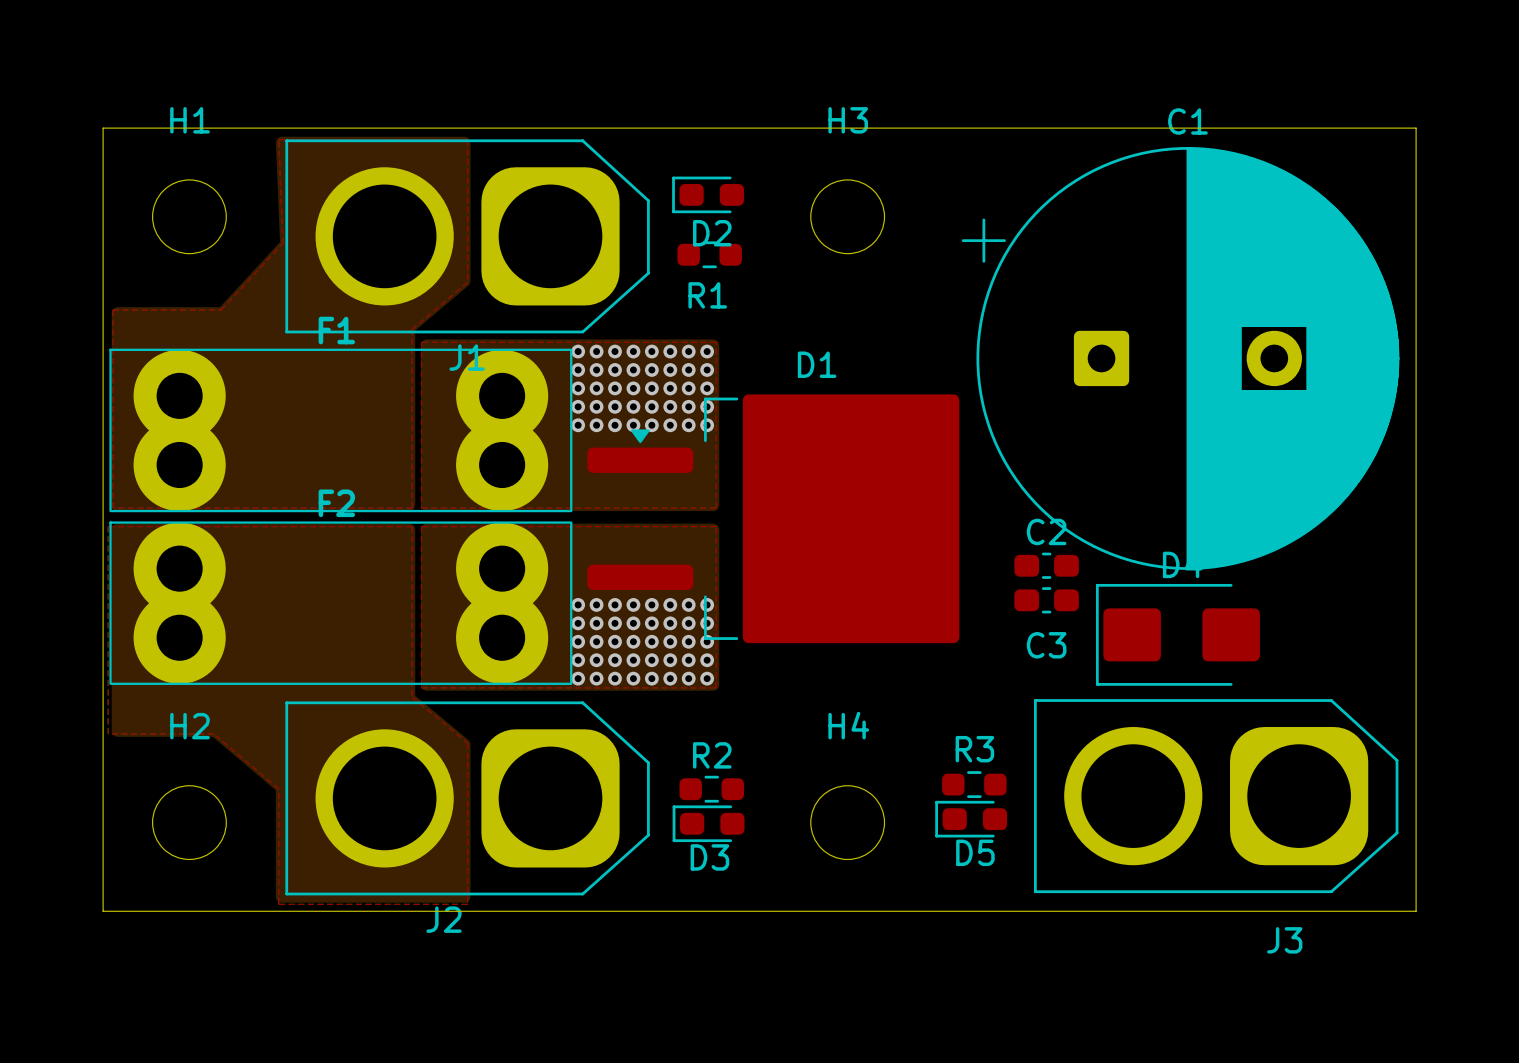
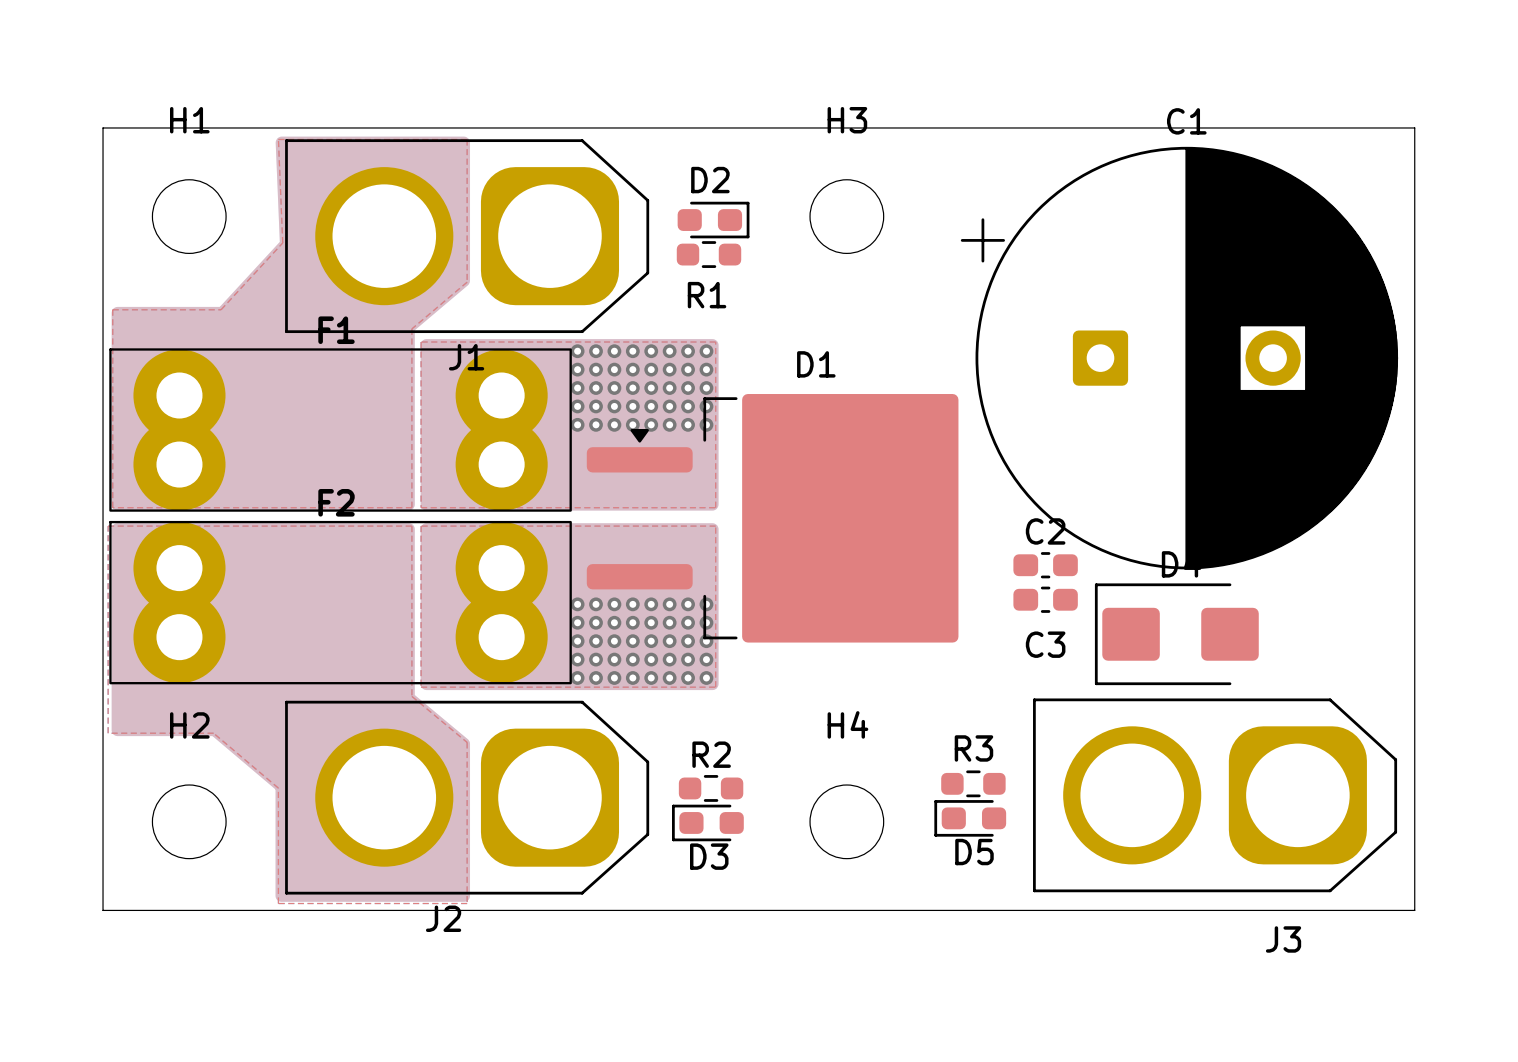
D2 rotation: 0° (708, 194) -> 180° (713, 220)

